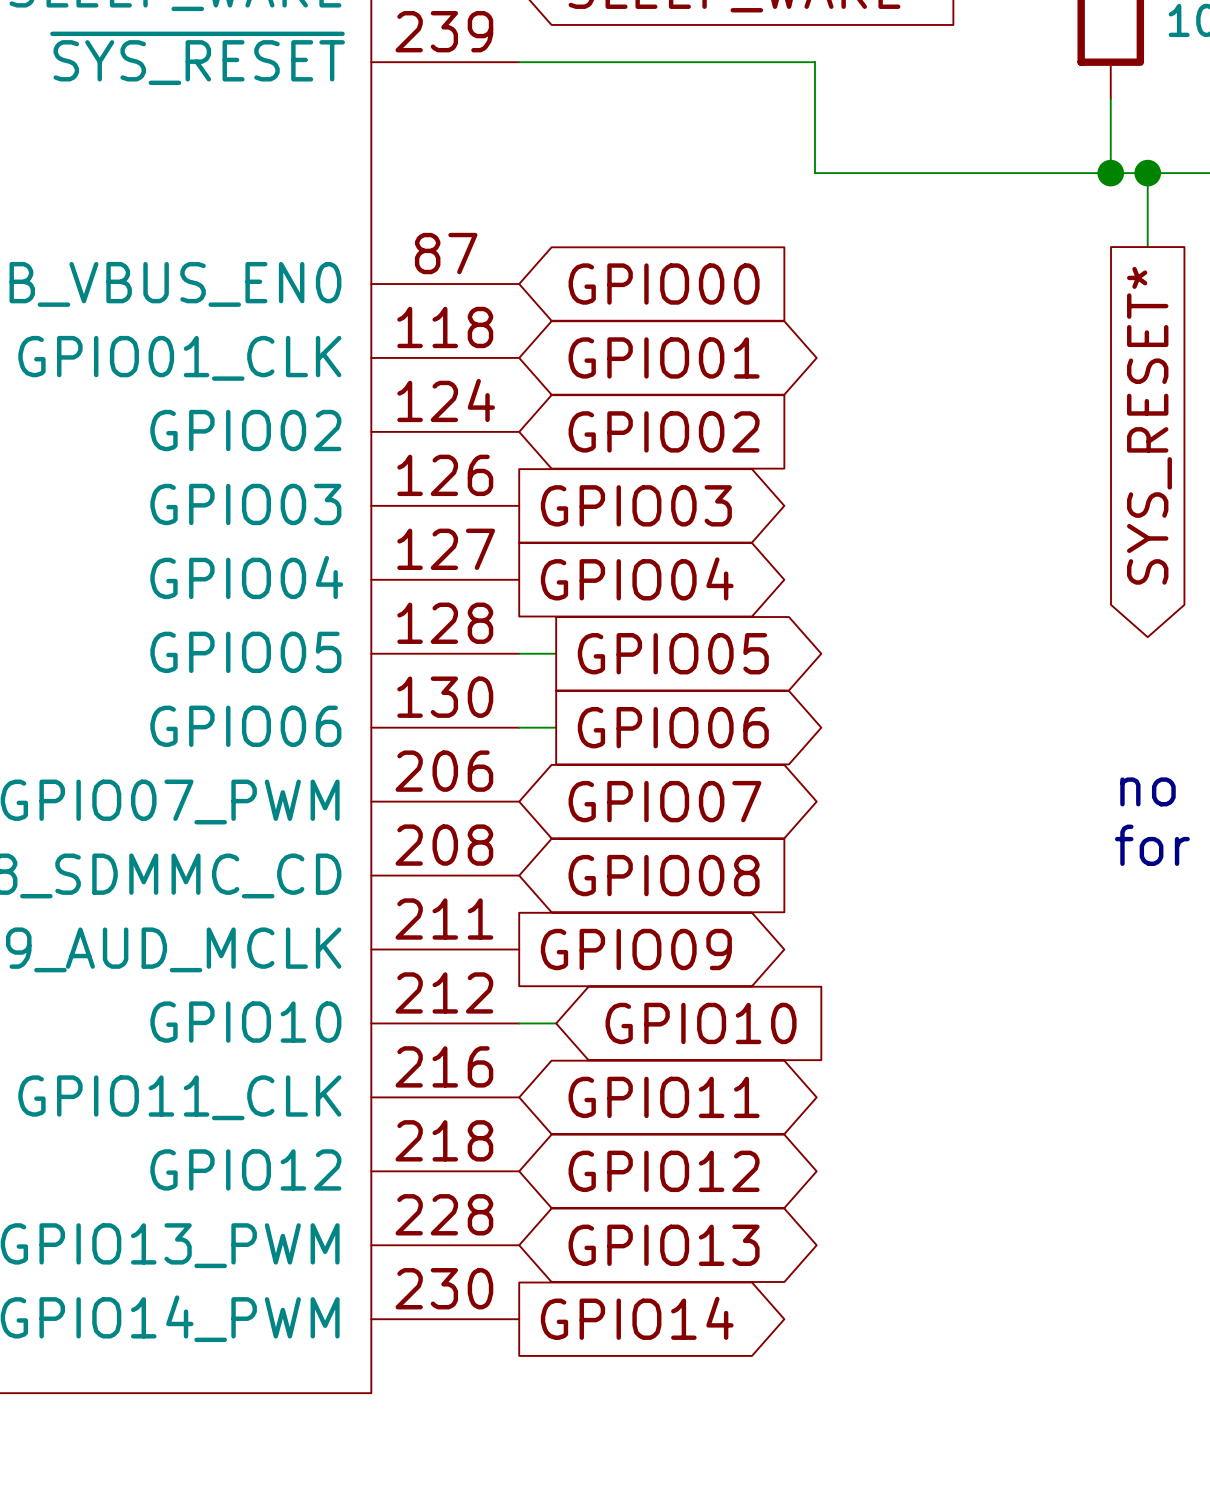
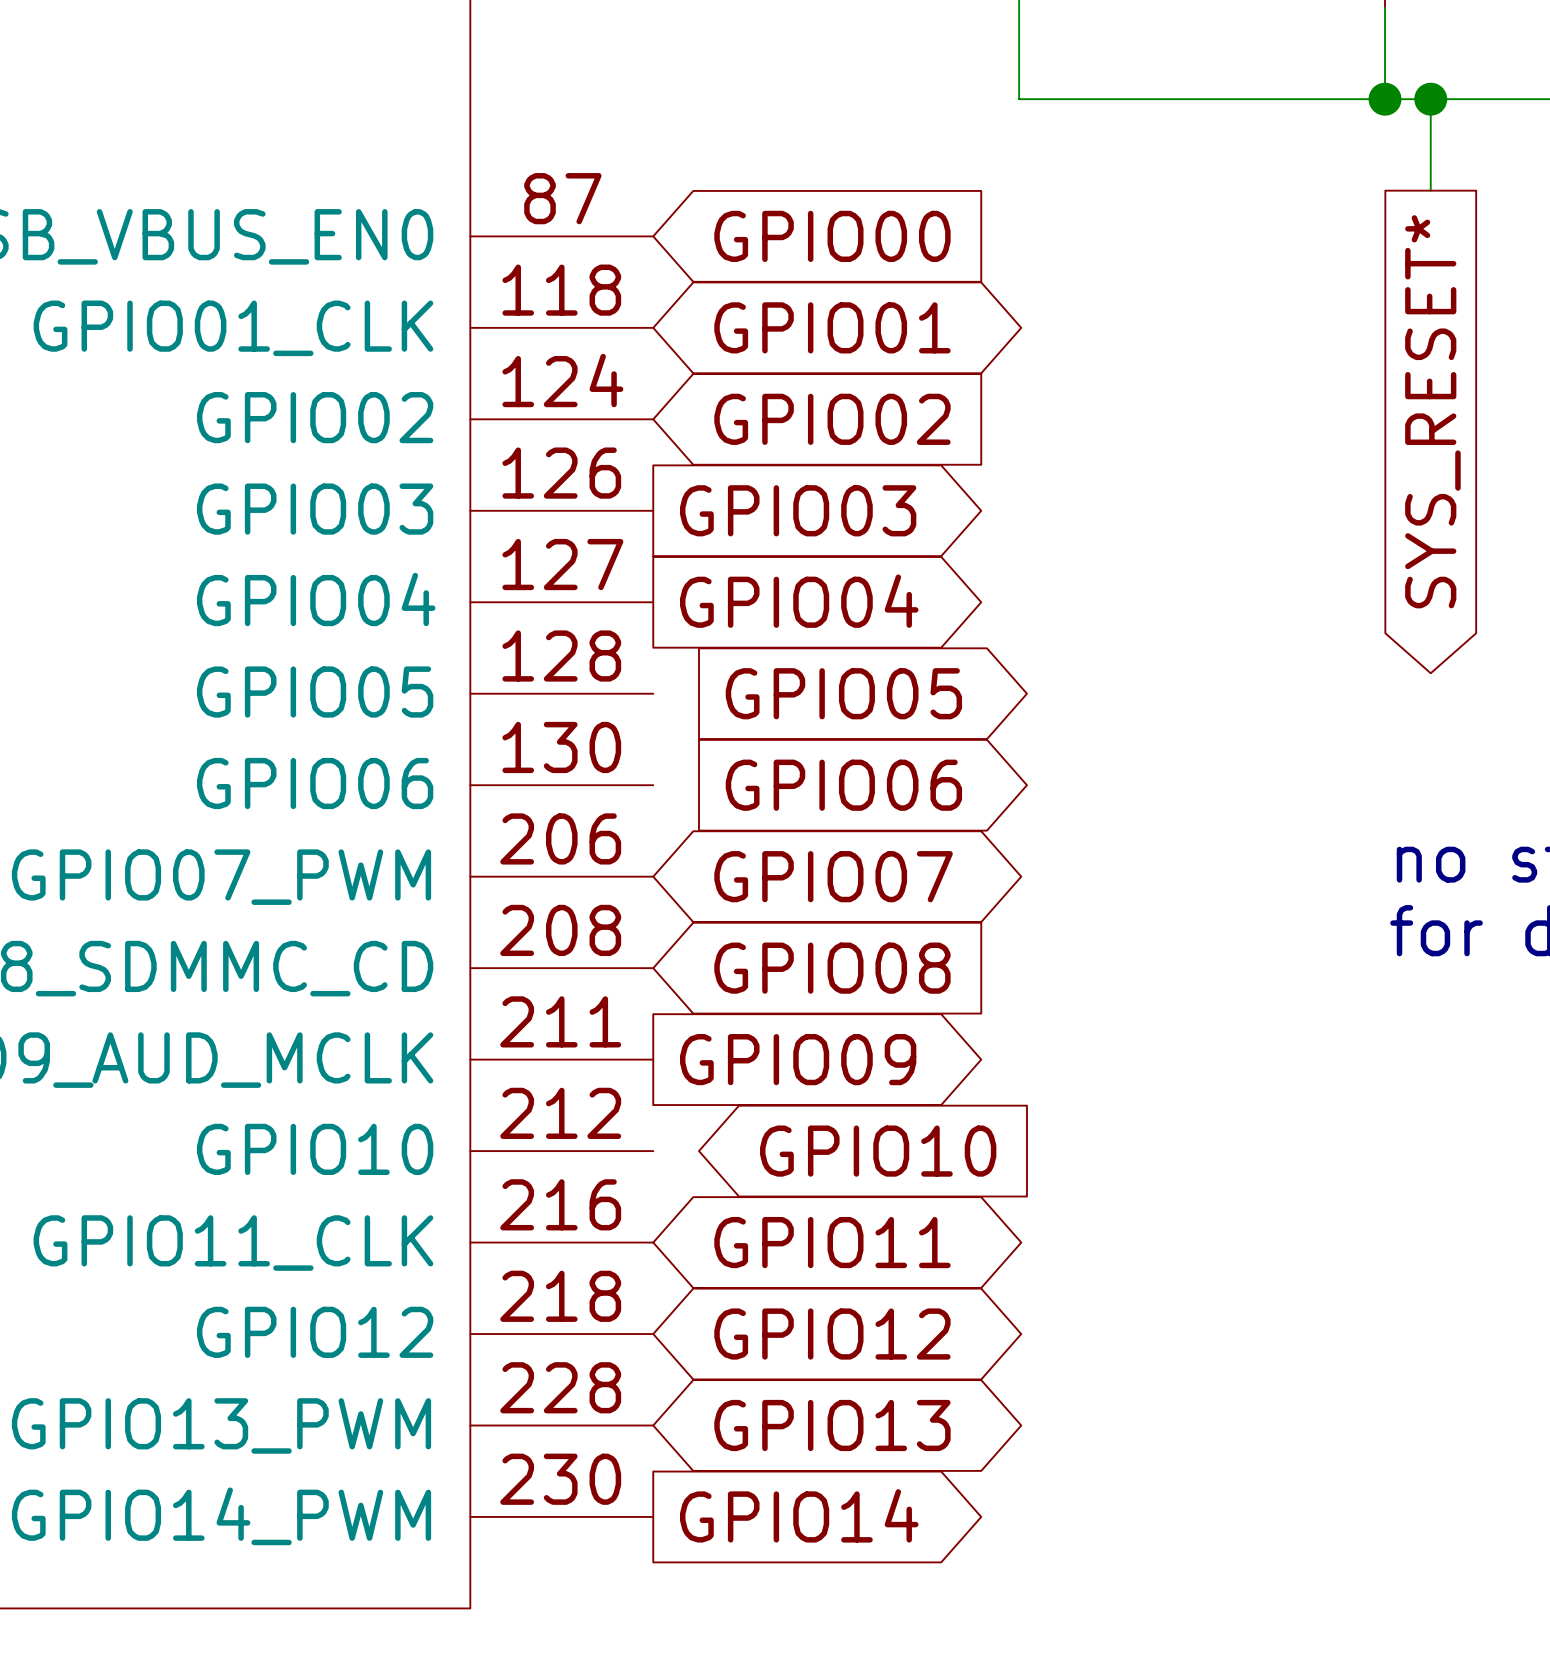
wire: (519, 653) (556, 653) -> none
wire: (519, 727) (556, 727) -> none
wire: (519, 1023) (556, 1023) -> none

